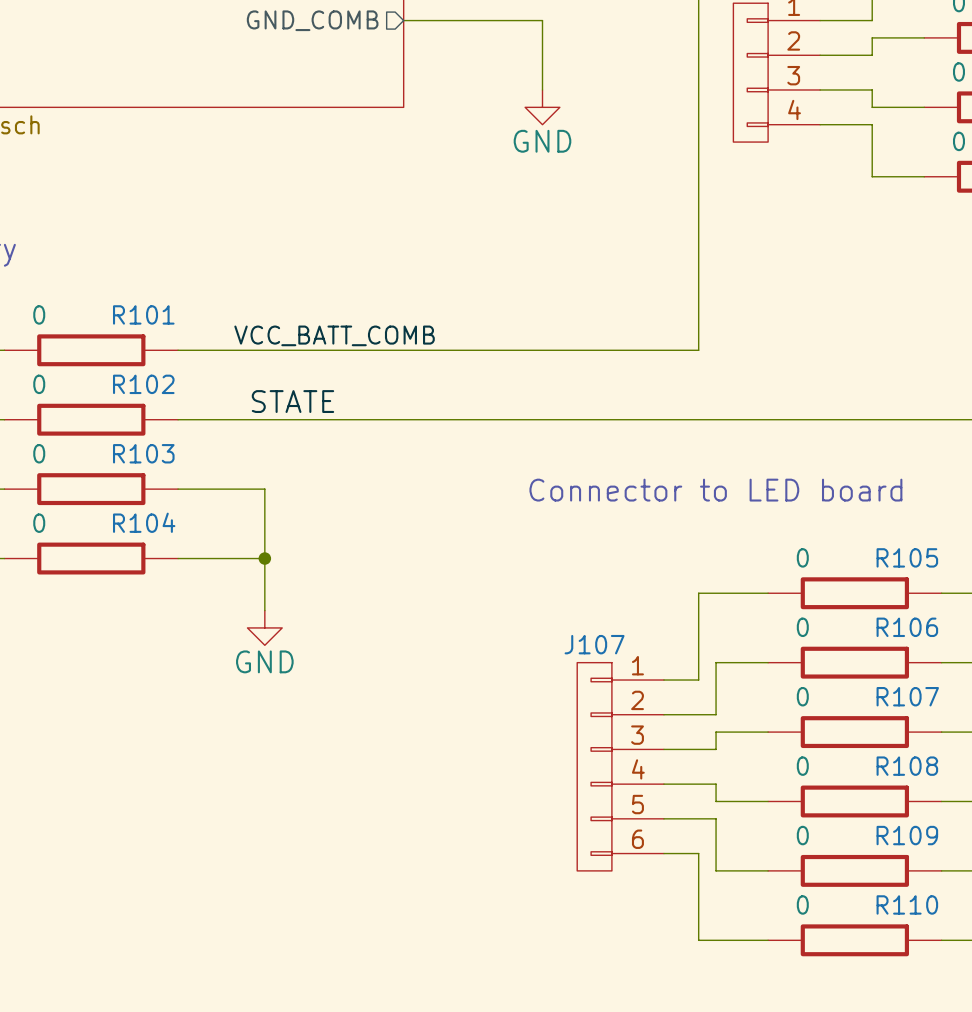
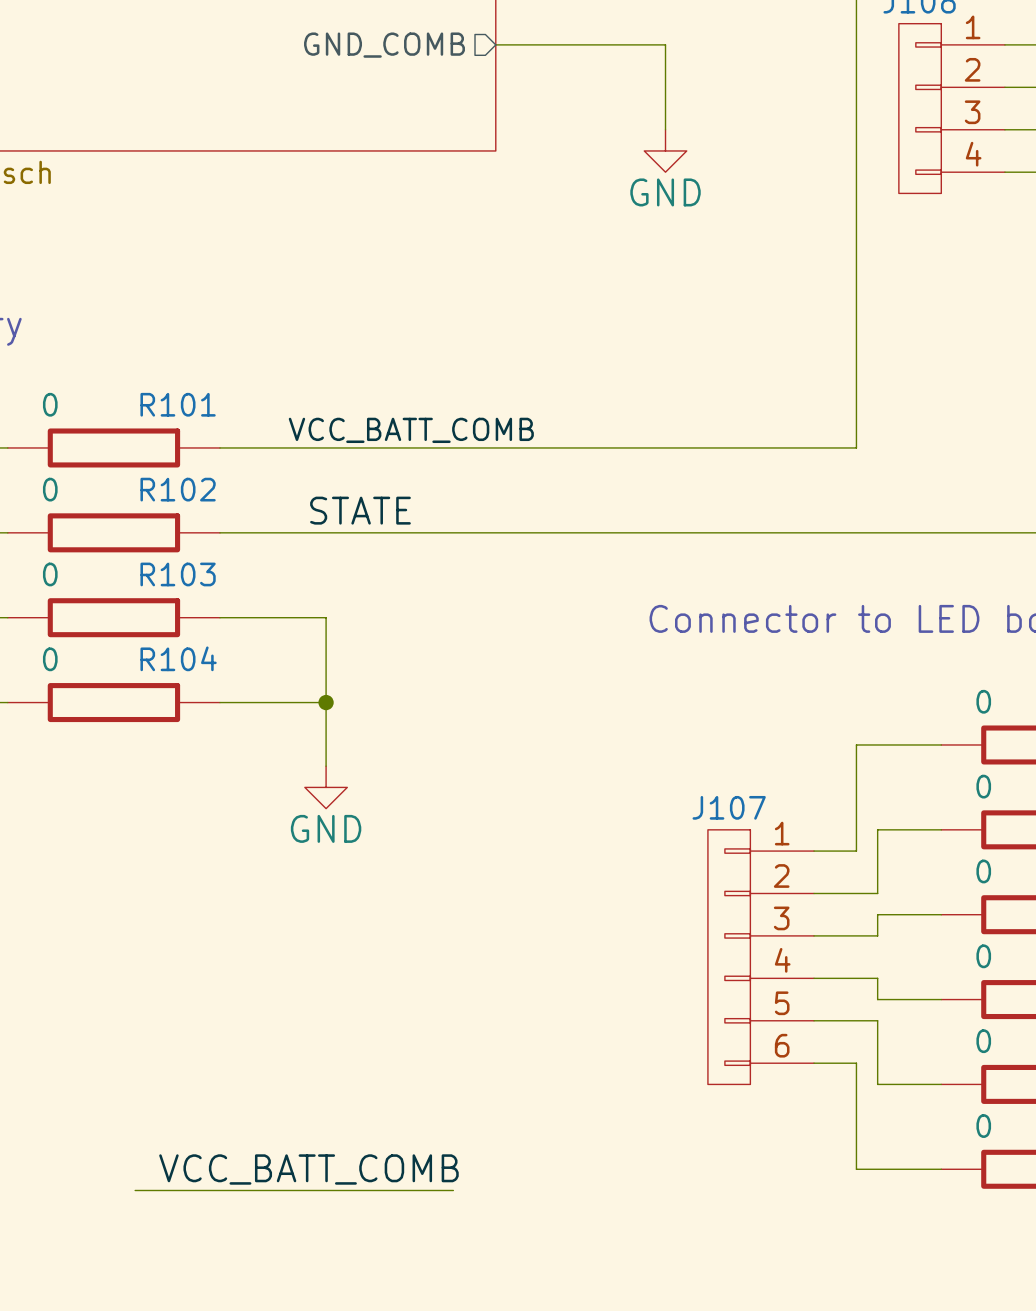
label: none -> VCC_BATT_COMB (308, 1169)
wire: none -> (135, 1190) (453, 1190)

